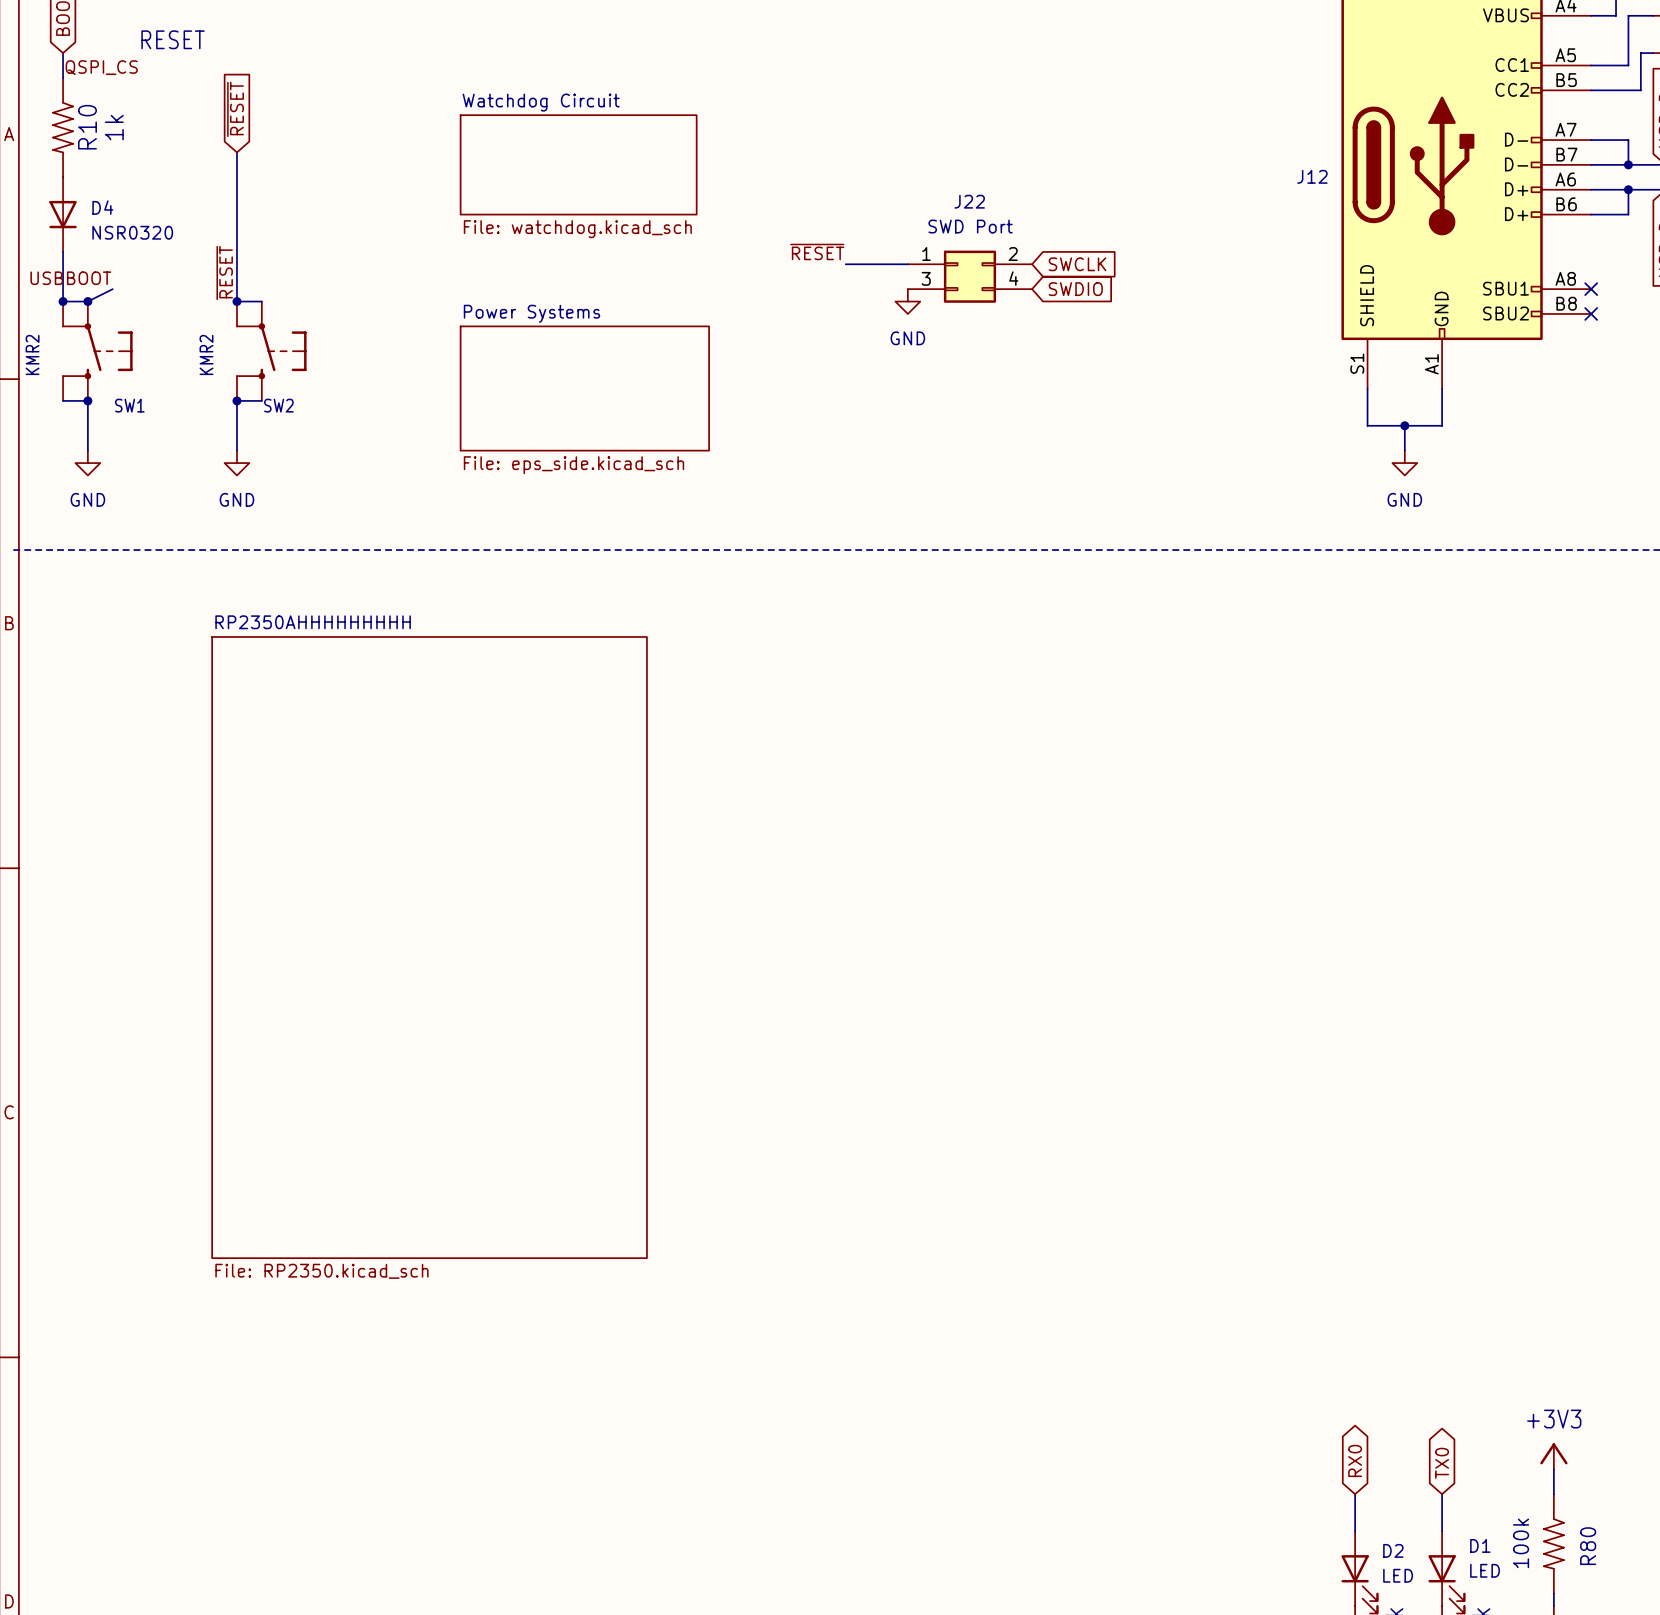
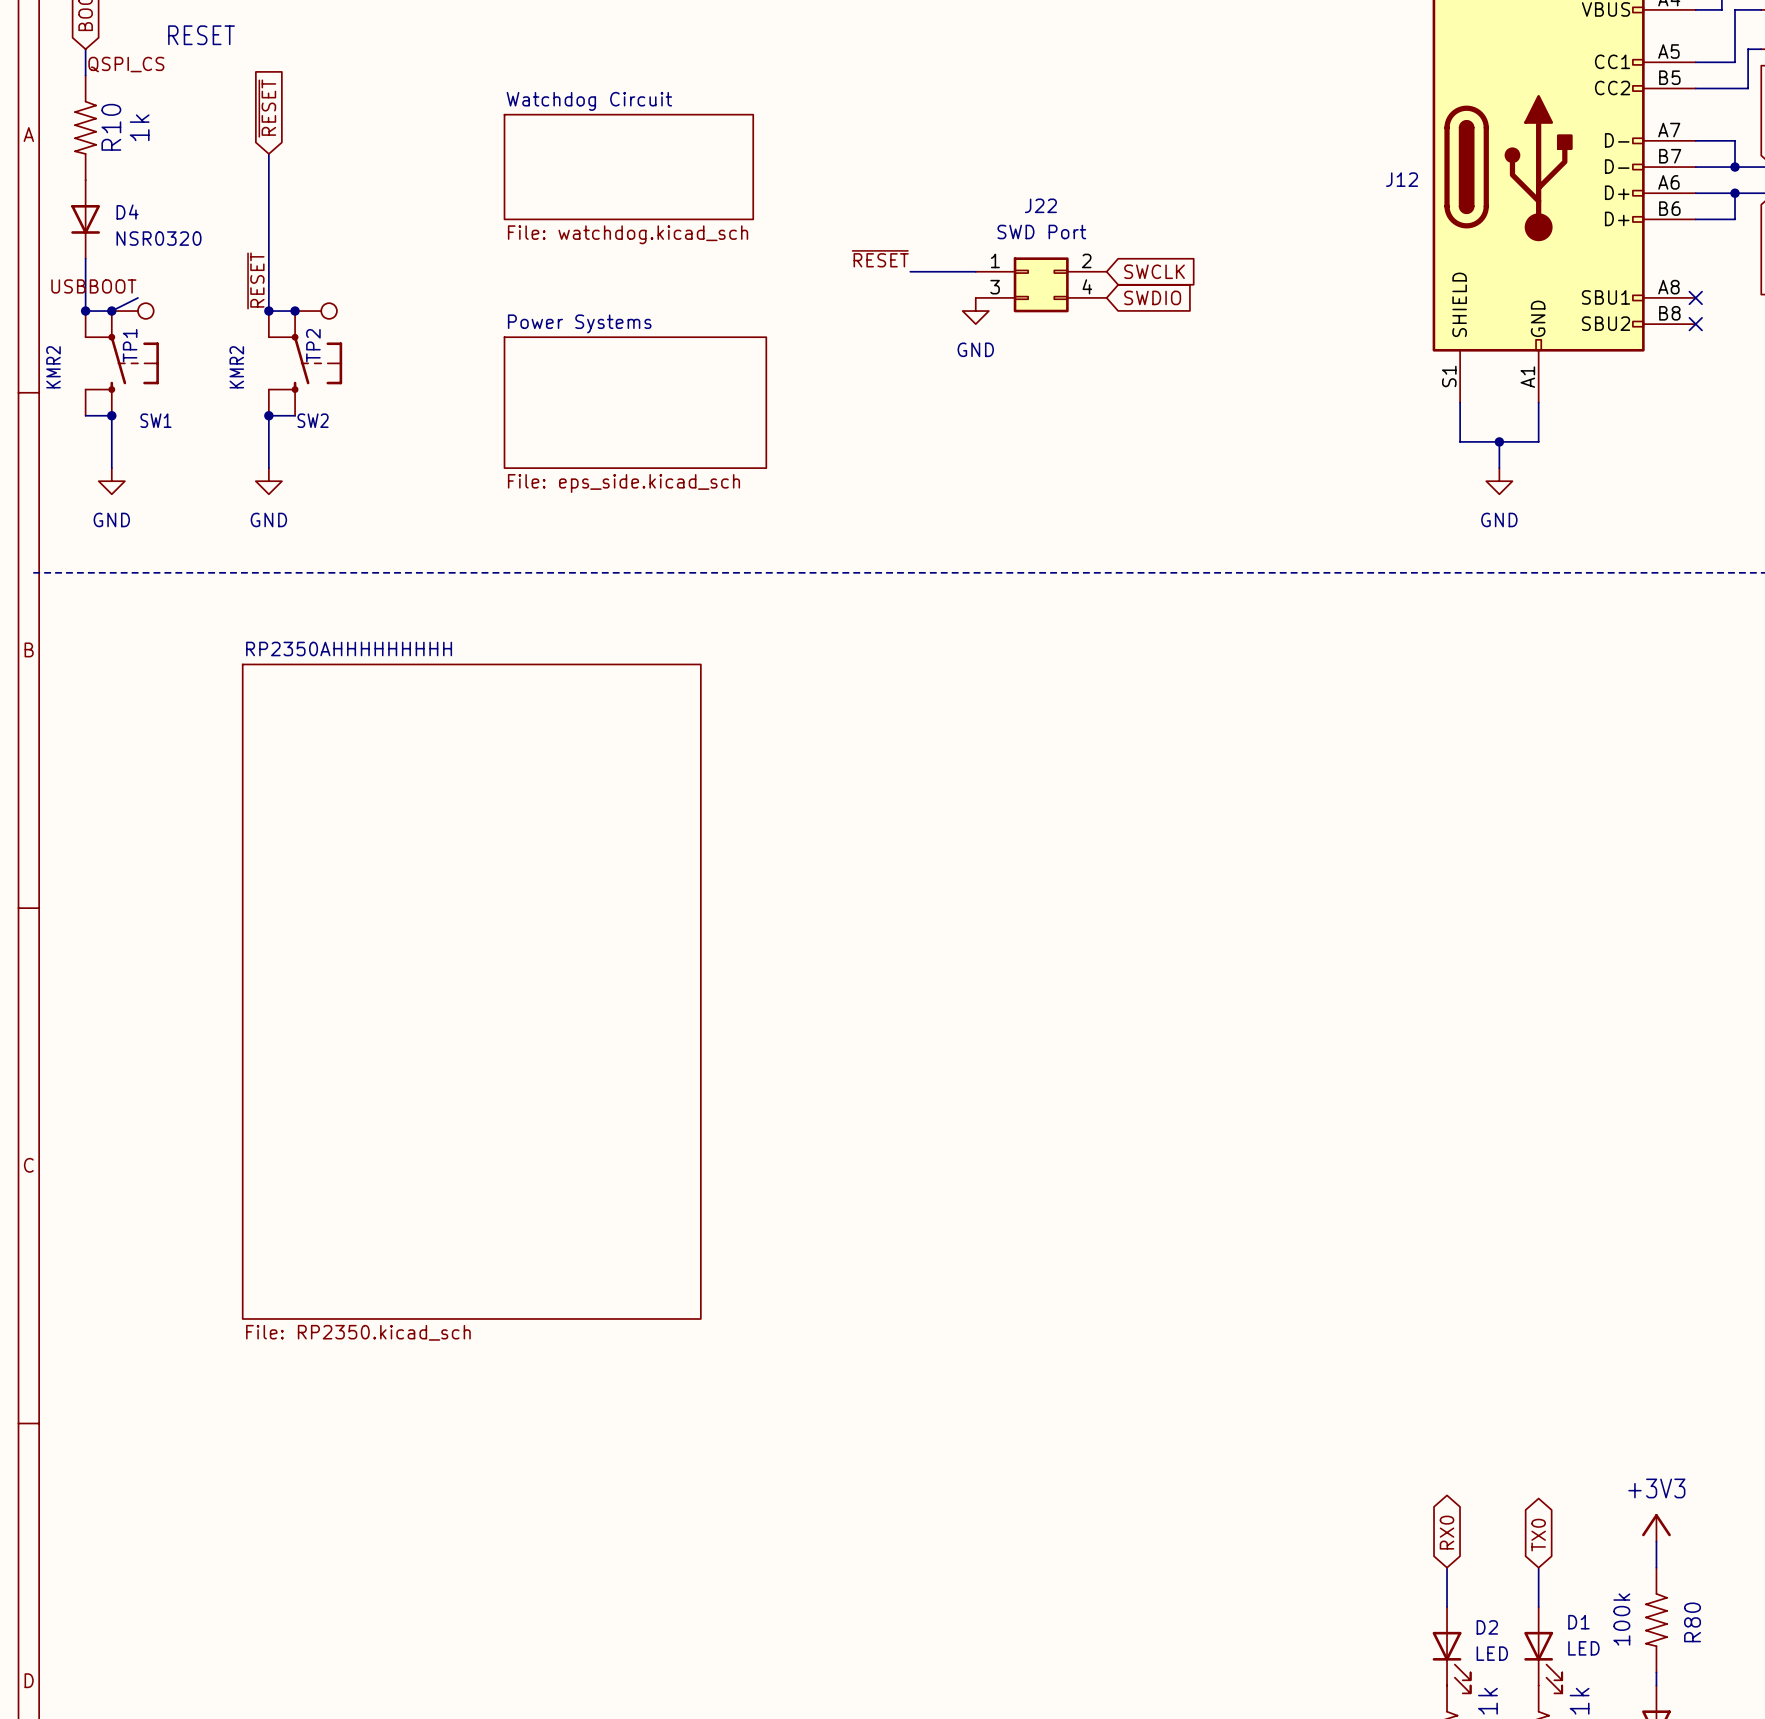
TP1: none -> (132, 311)
junction: none -> (295, 311)
TP2: none -> (316, 311)

